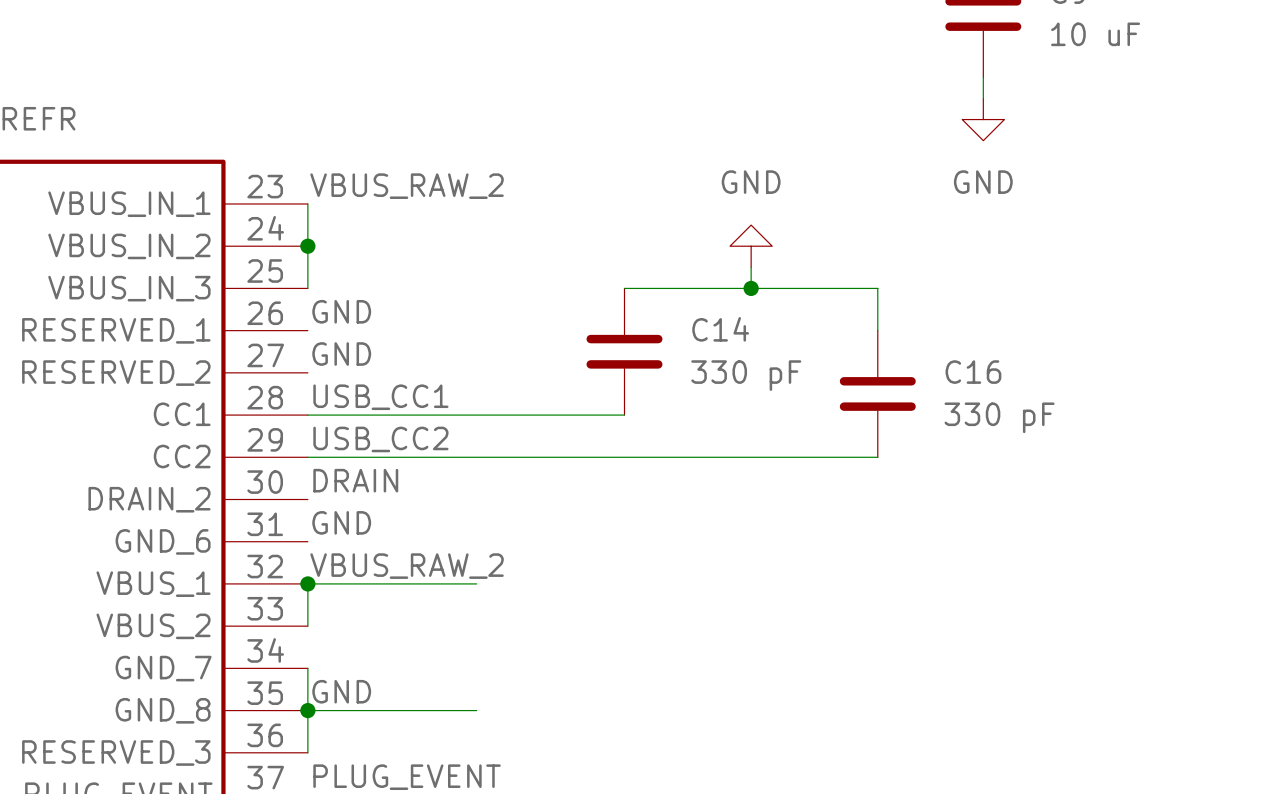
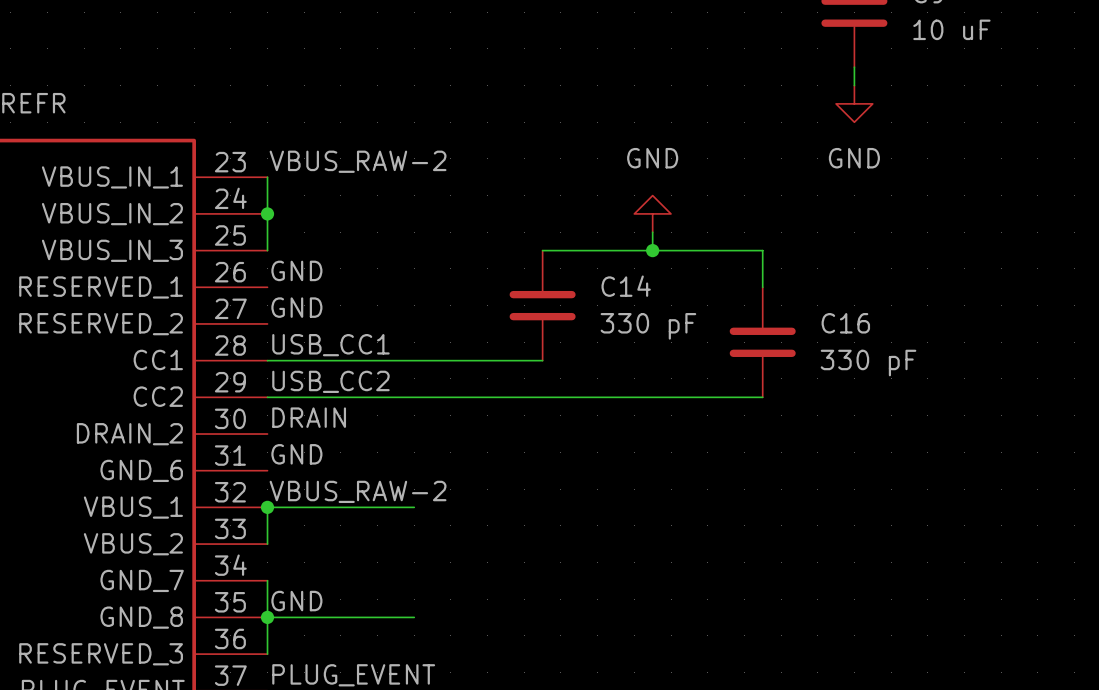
label: VBUS_RAW_2 (407, 186) -> VBUS_RAW-2 (358, 161)
label: VBUS_RAW_2 (407, 566) -> VBUS_RAW-2 (358, 491)

